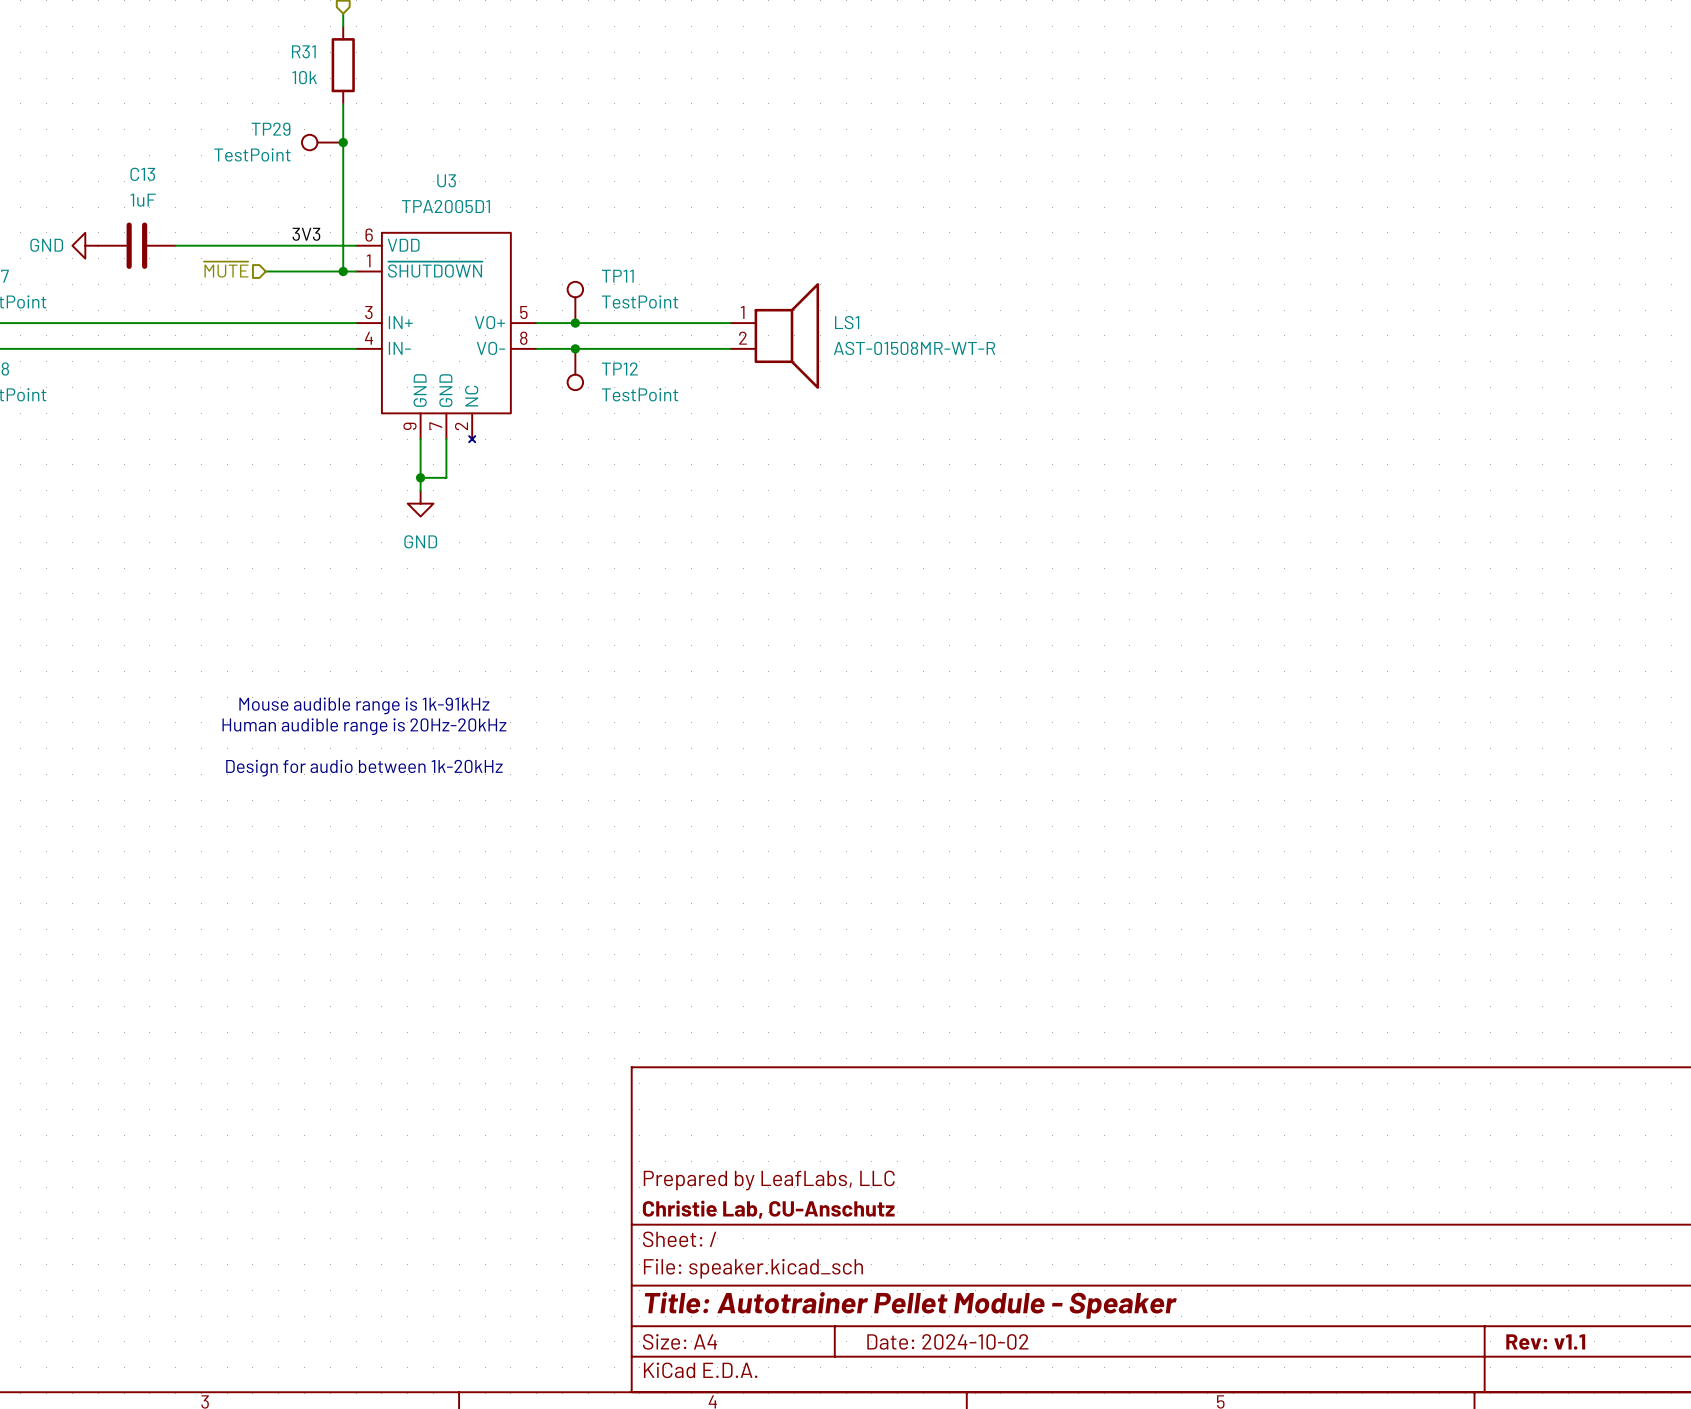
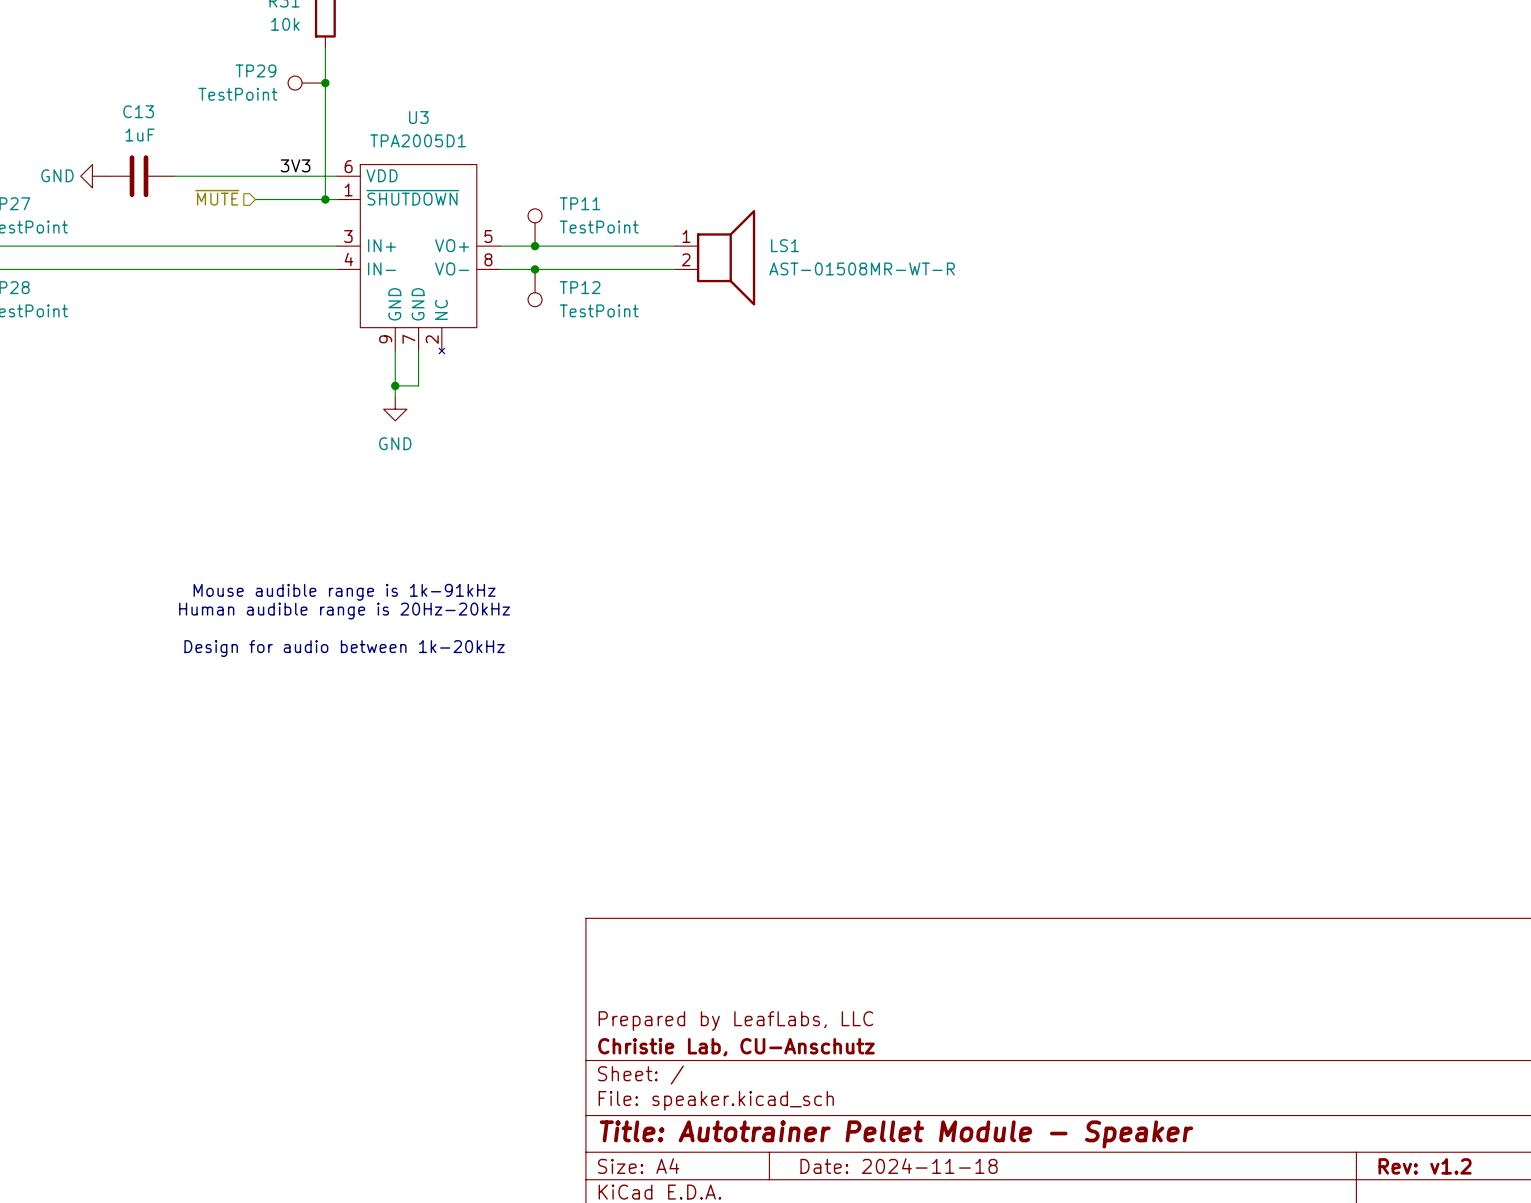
title block: Date: 2024-10-02 (947, 1341) -> Date: 2024-11-18 (899, 1166)
title block: Rev: v1.1 (1545, 1341) -> Rev: v1.2 (1425, 1166)

